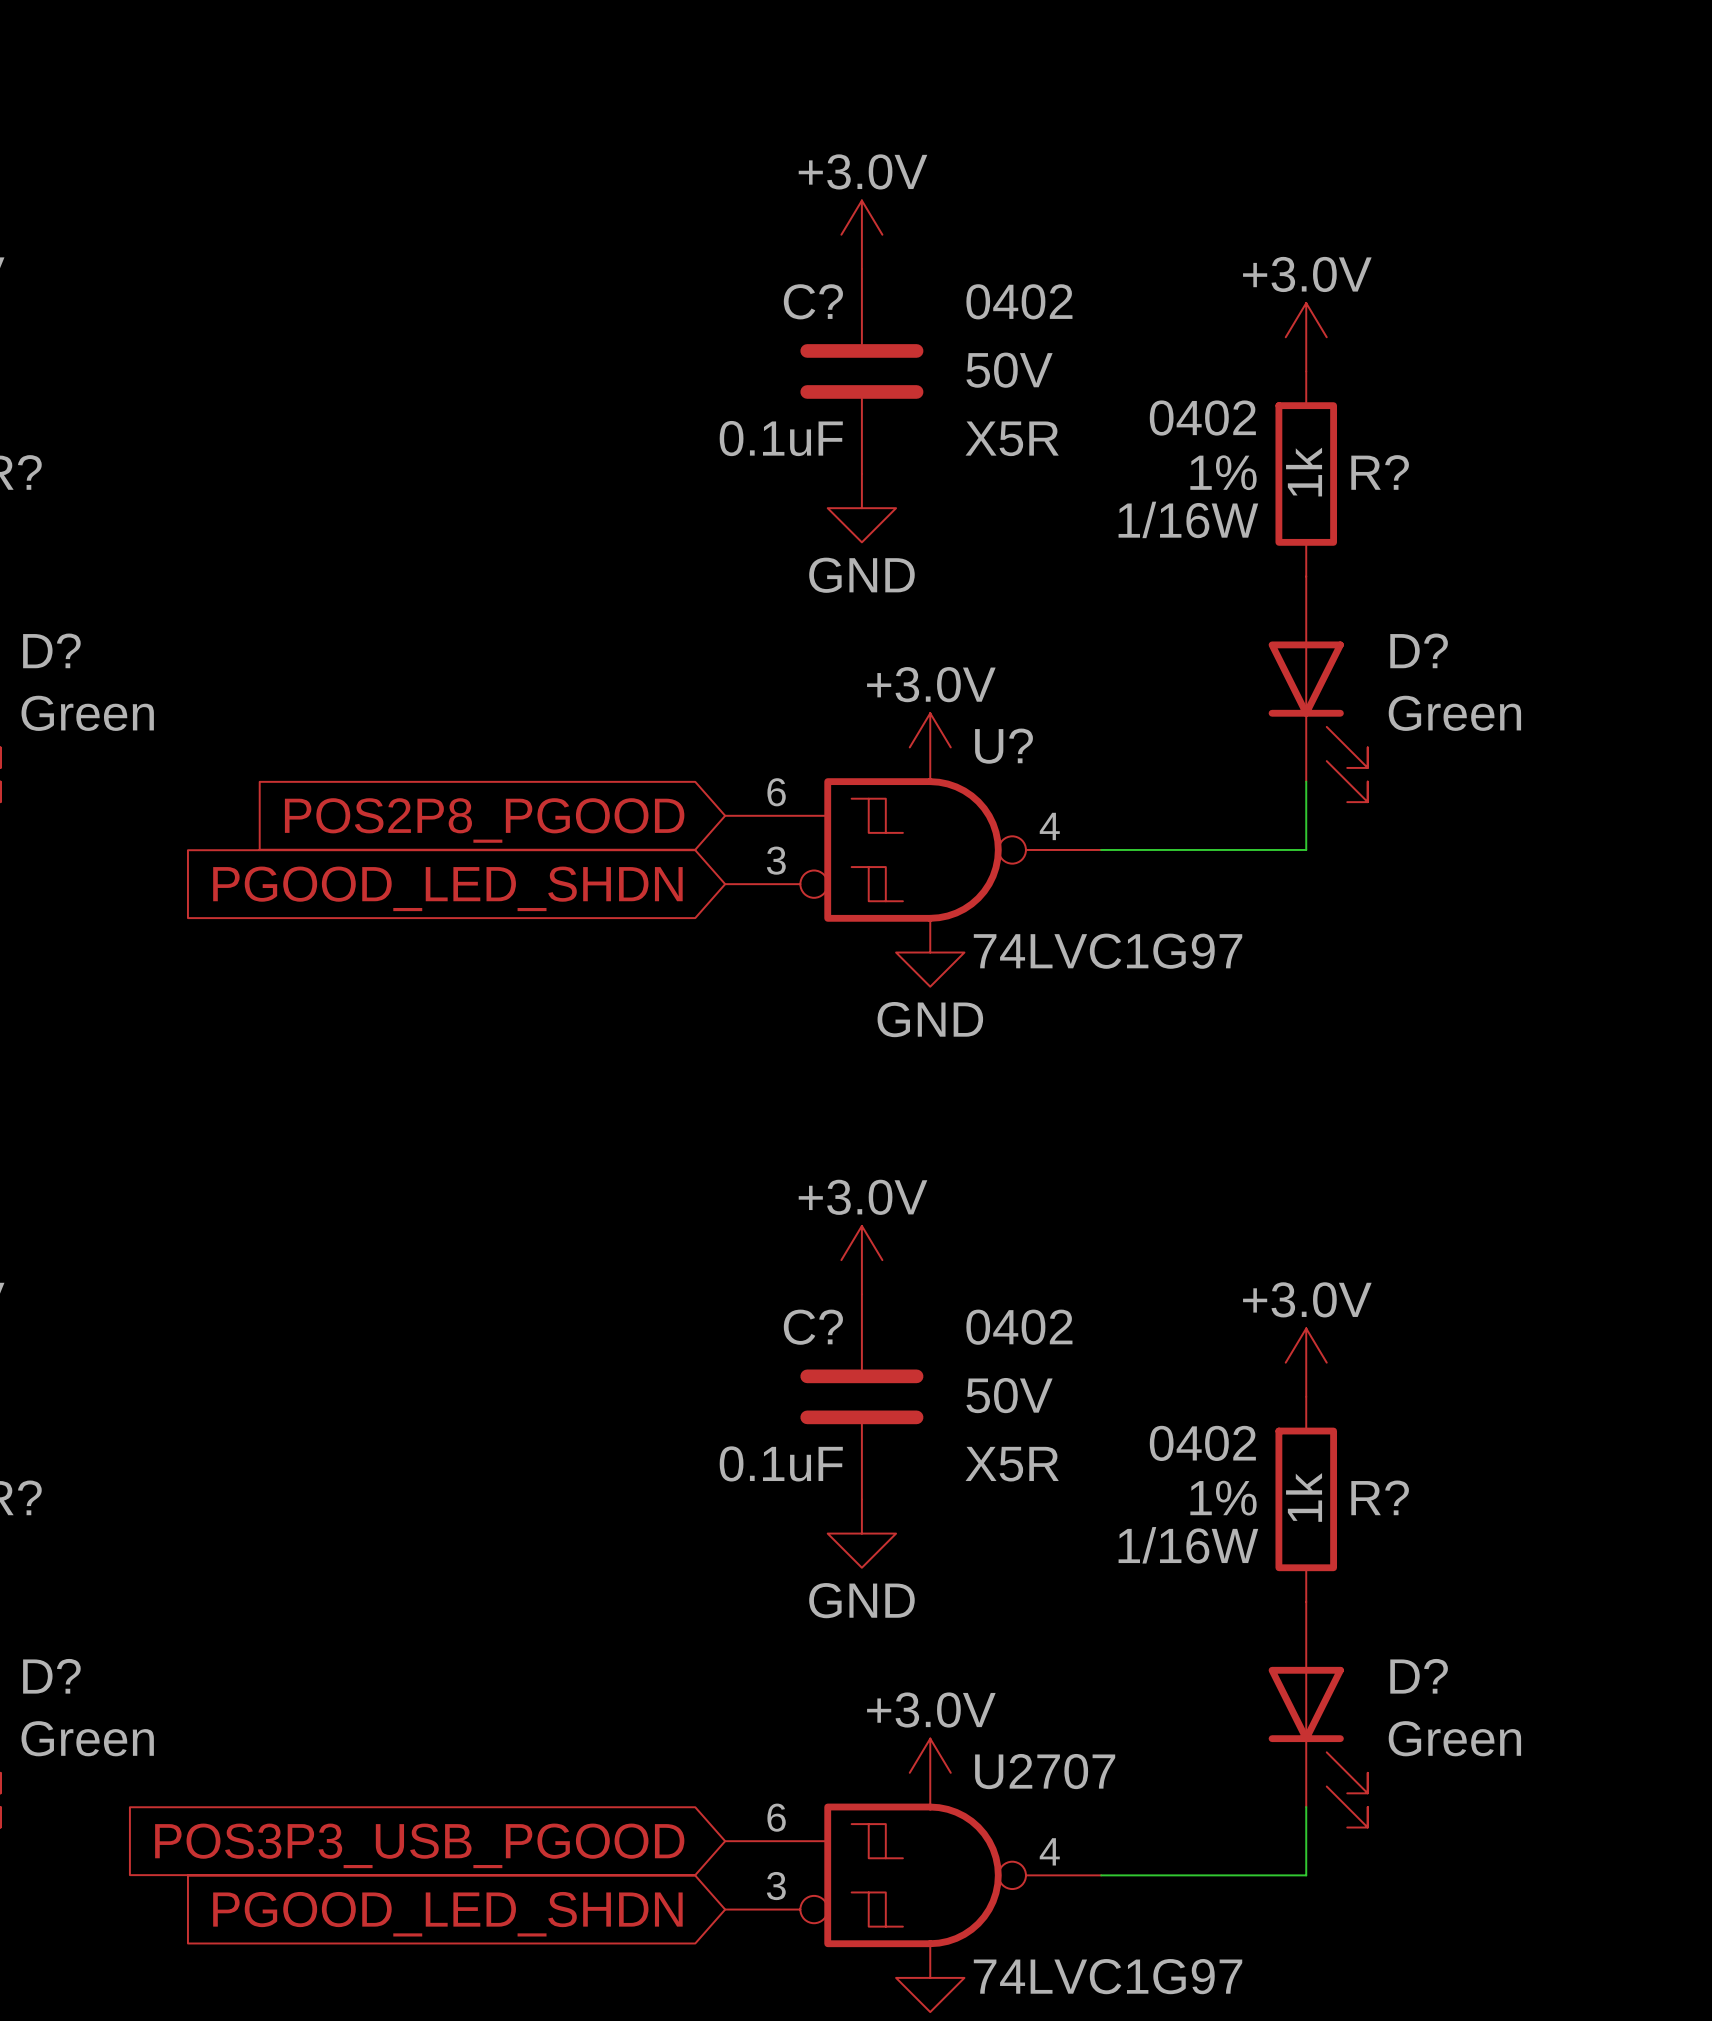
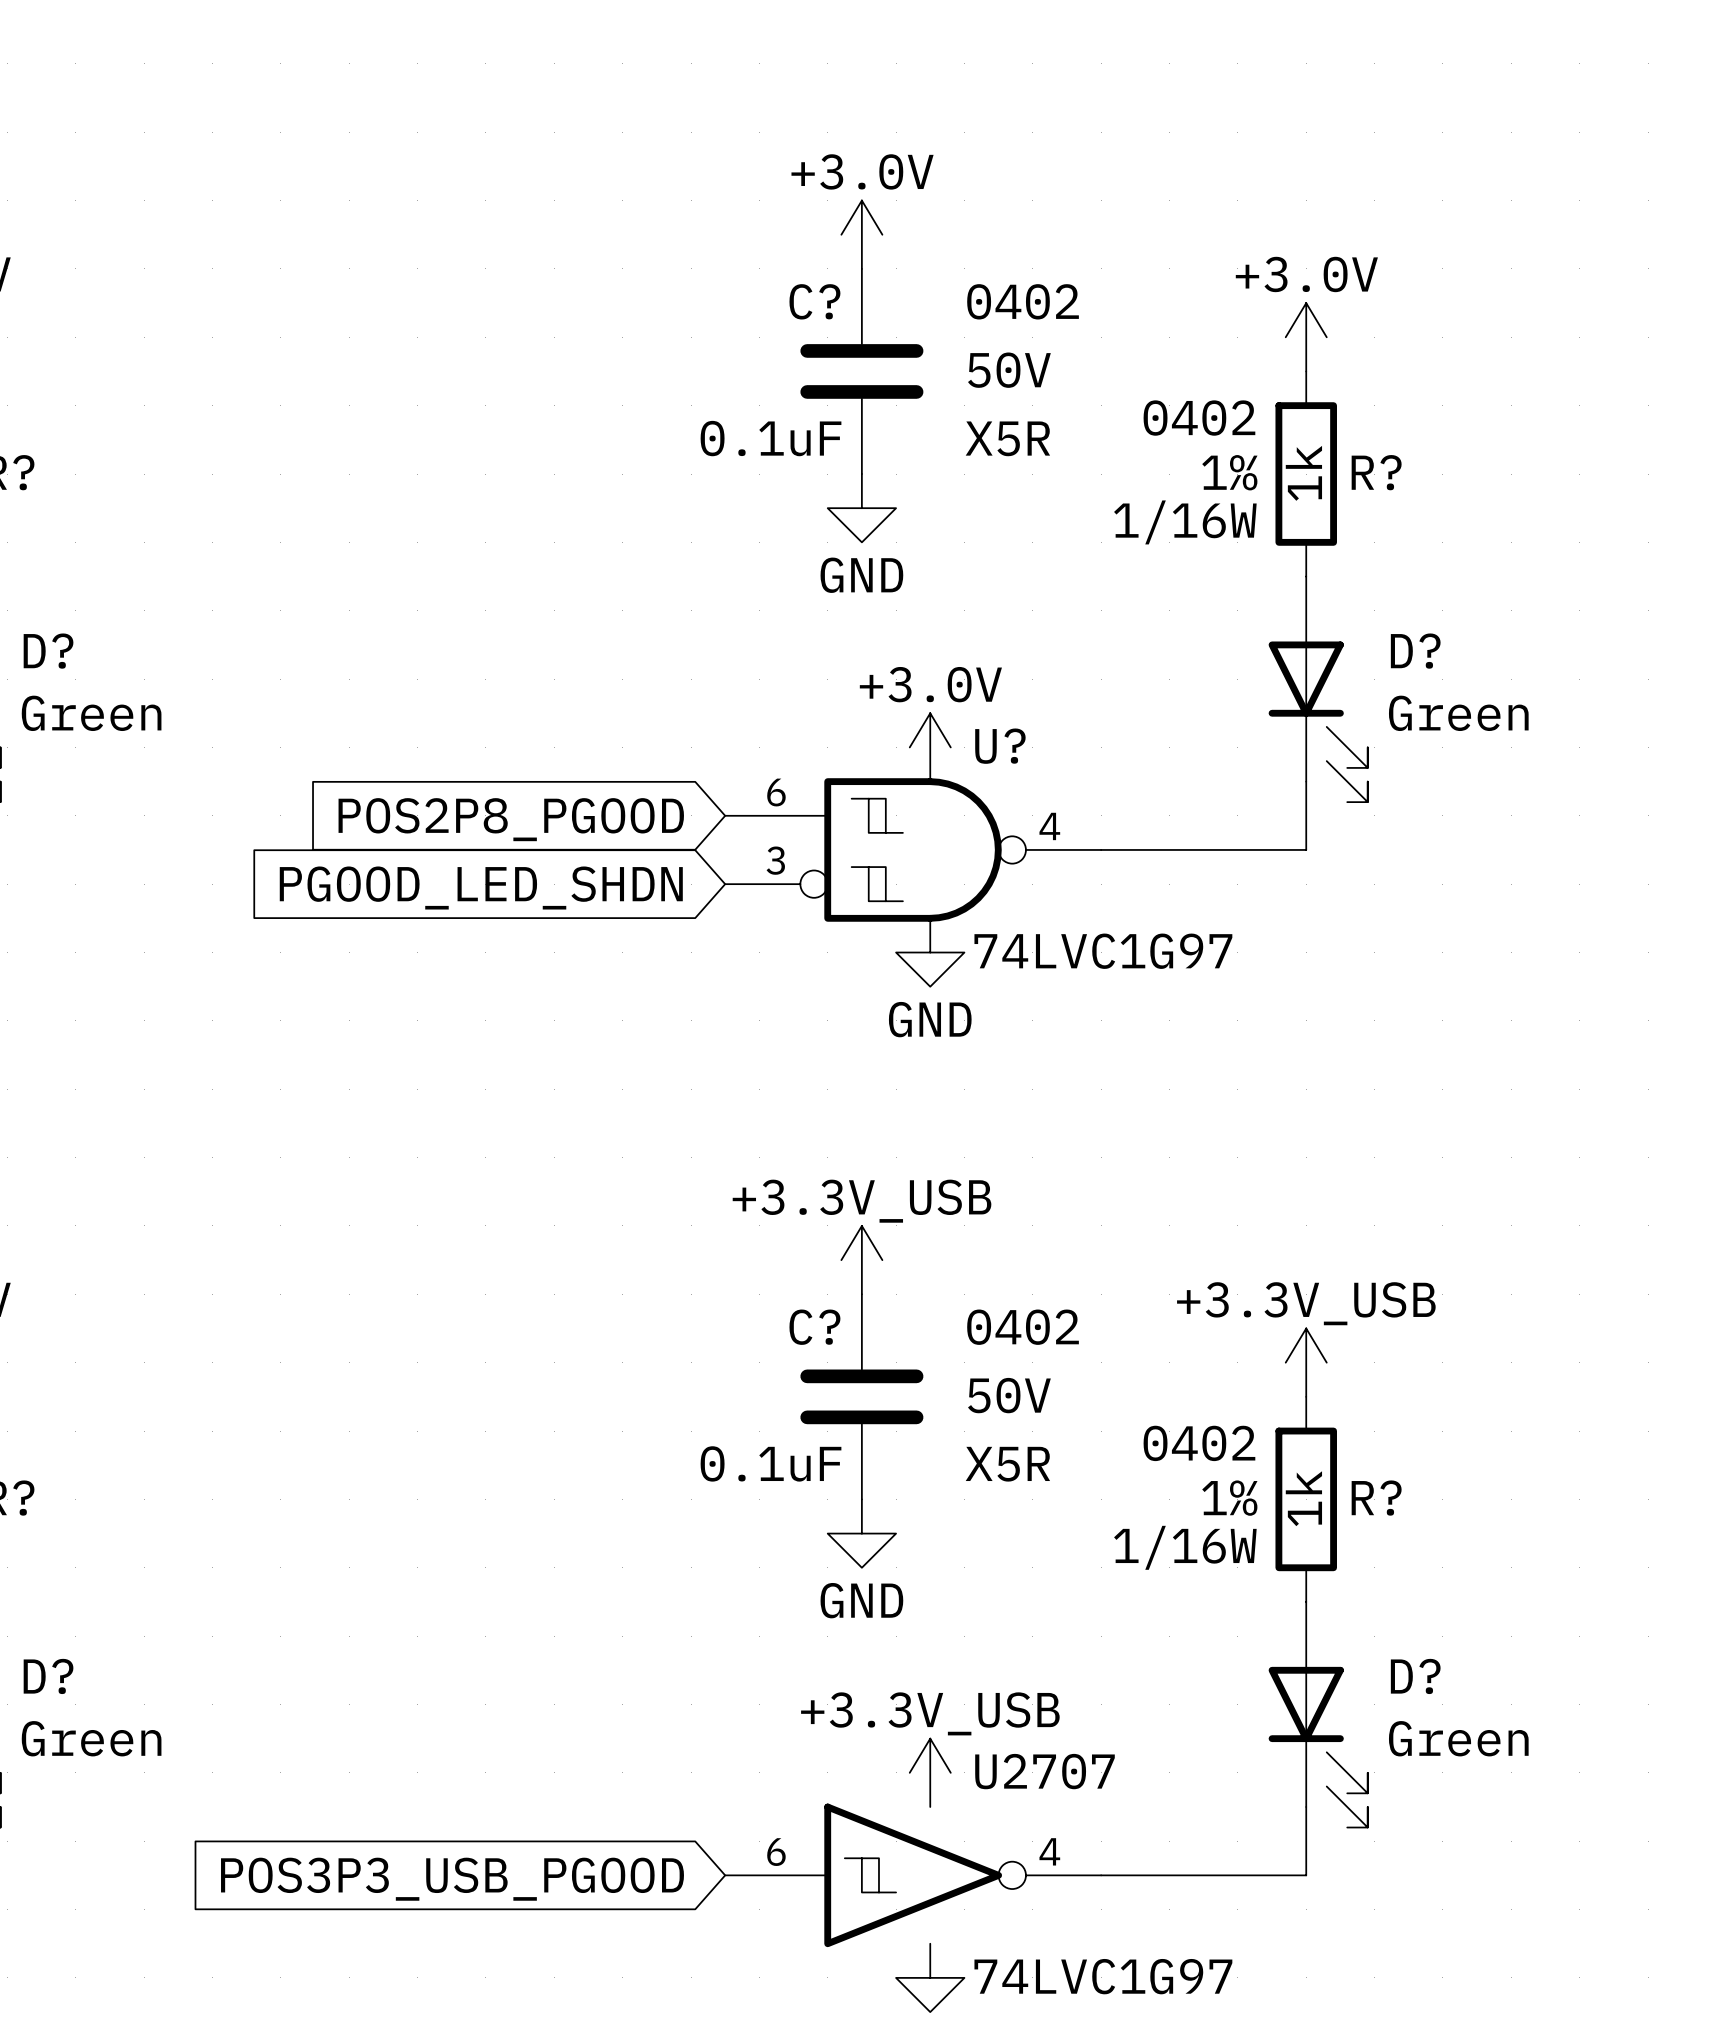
power symbol: +3.0V (861, 1260) -> +3.3V_USB (861, 1260)
power symbol: +3.0V (1306, 1362) -> +3.3V_USB (1306, 1362)
power symbol: +3.0V (930, 1772) -> +3.3V_USB (930, 1772)
U2707 symbol: [725, 1803, 1102, 1948] -> [725, 1803, 1102, 1948]
global label position: POS3P3_USB_PGOOD (419, 1845) -> POS3P3_USB_PGOOD (452, 1879)
global label: PGOOD_LED_SHDN (447, 1914) -> none

